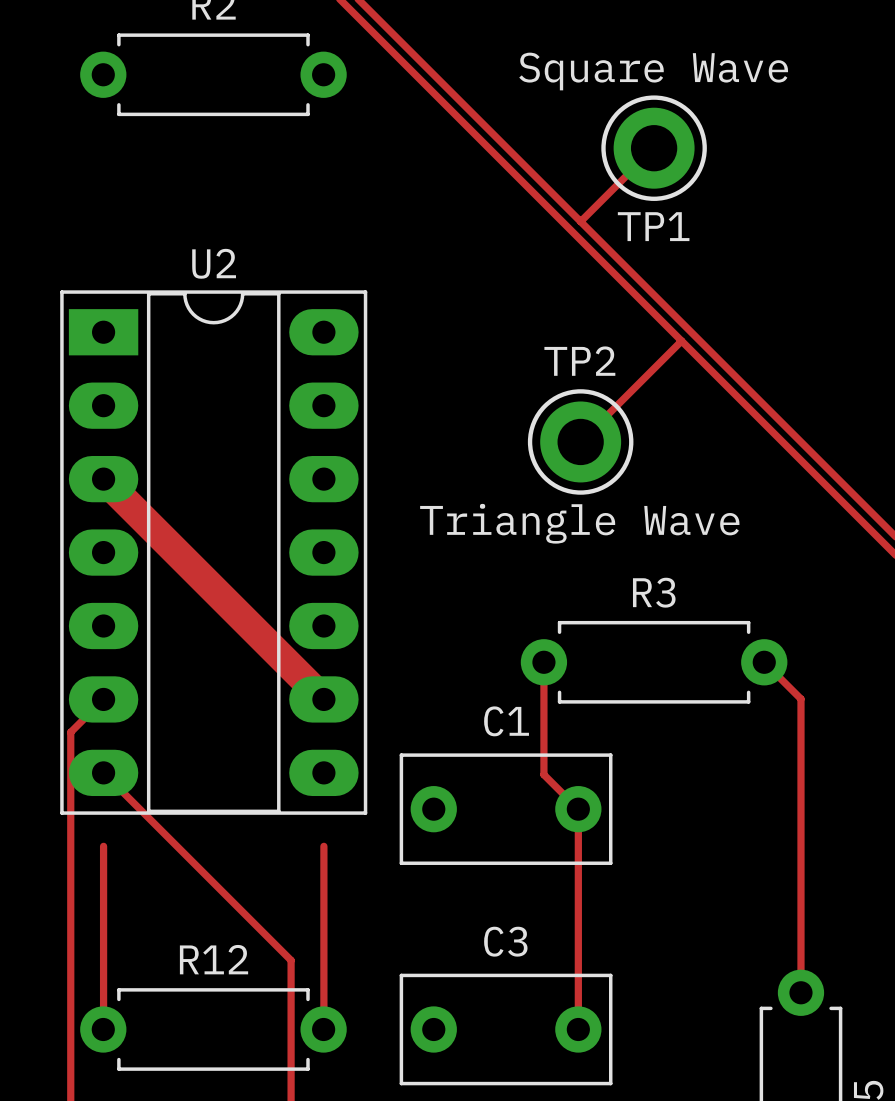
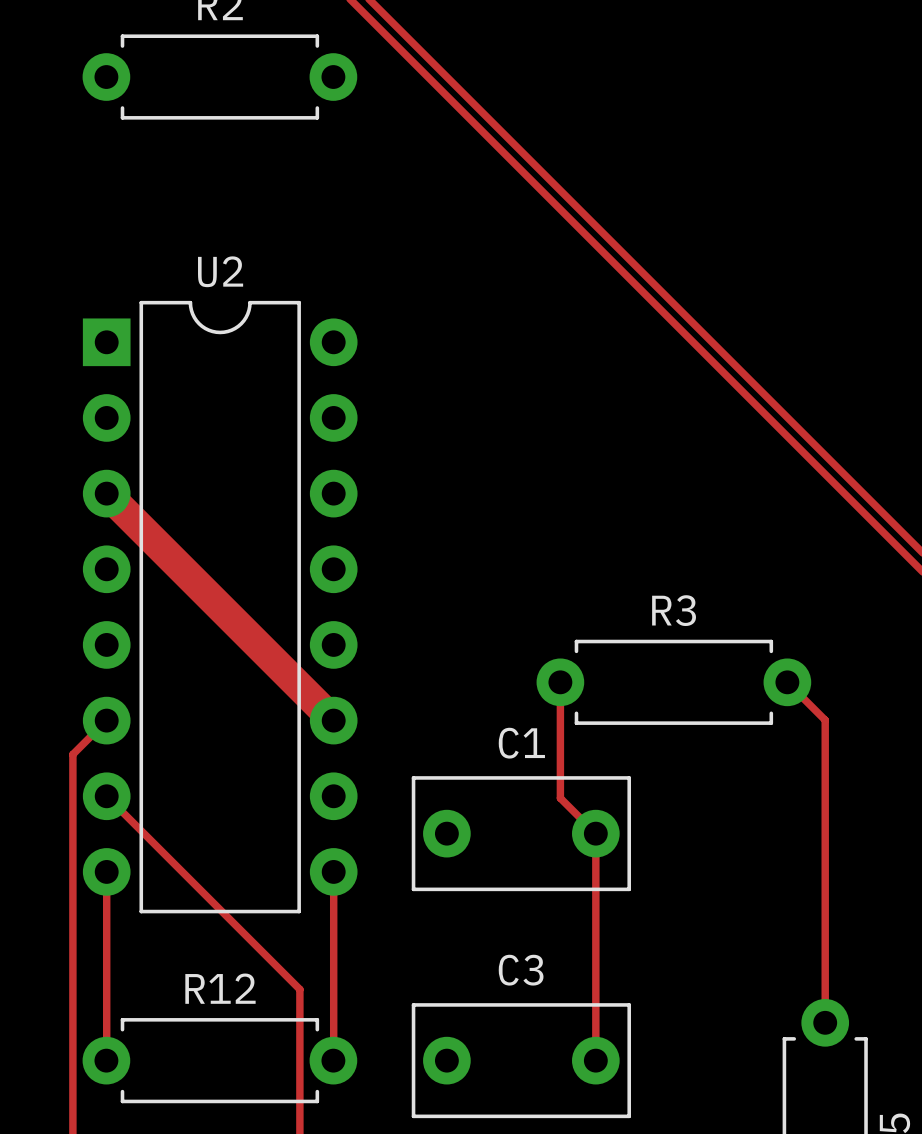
track: (654, 148) (580, 221) -> none
TP1: Square Wave (654, 148) -> none
U2 footprint: [60, 290, 368, 815] -> [82, 300, 358, 914]
track: (681, 341) (580, 441) -> none
TP2: Triangle Wave (580, 441) -> none

